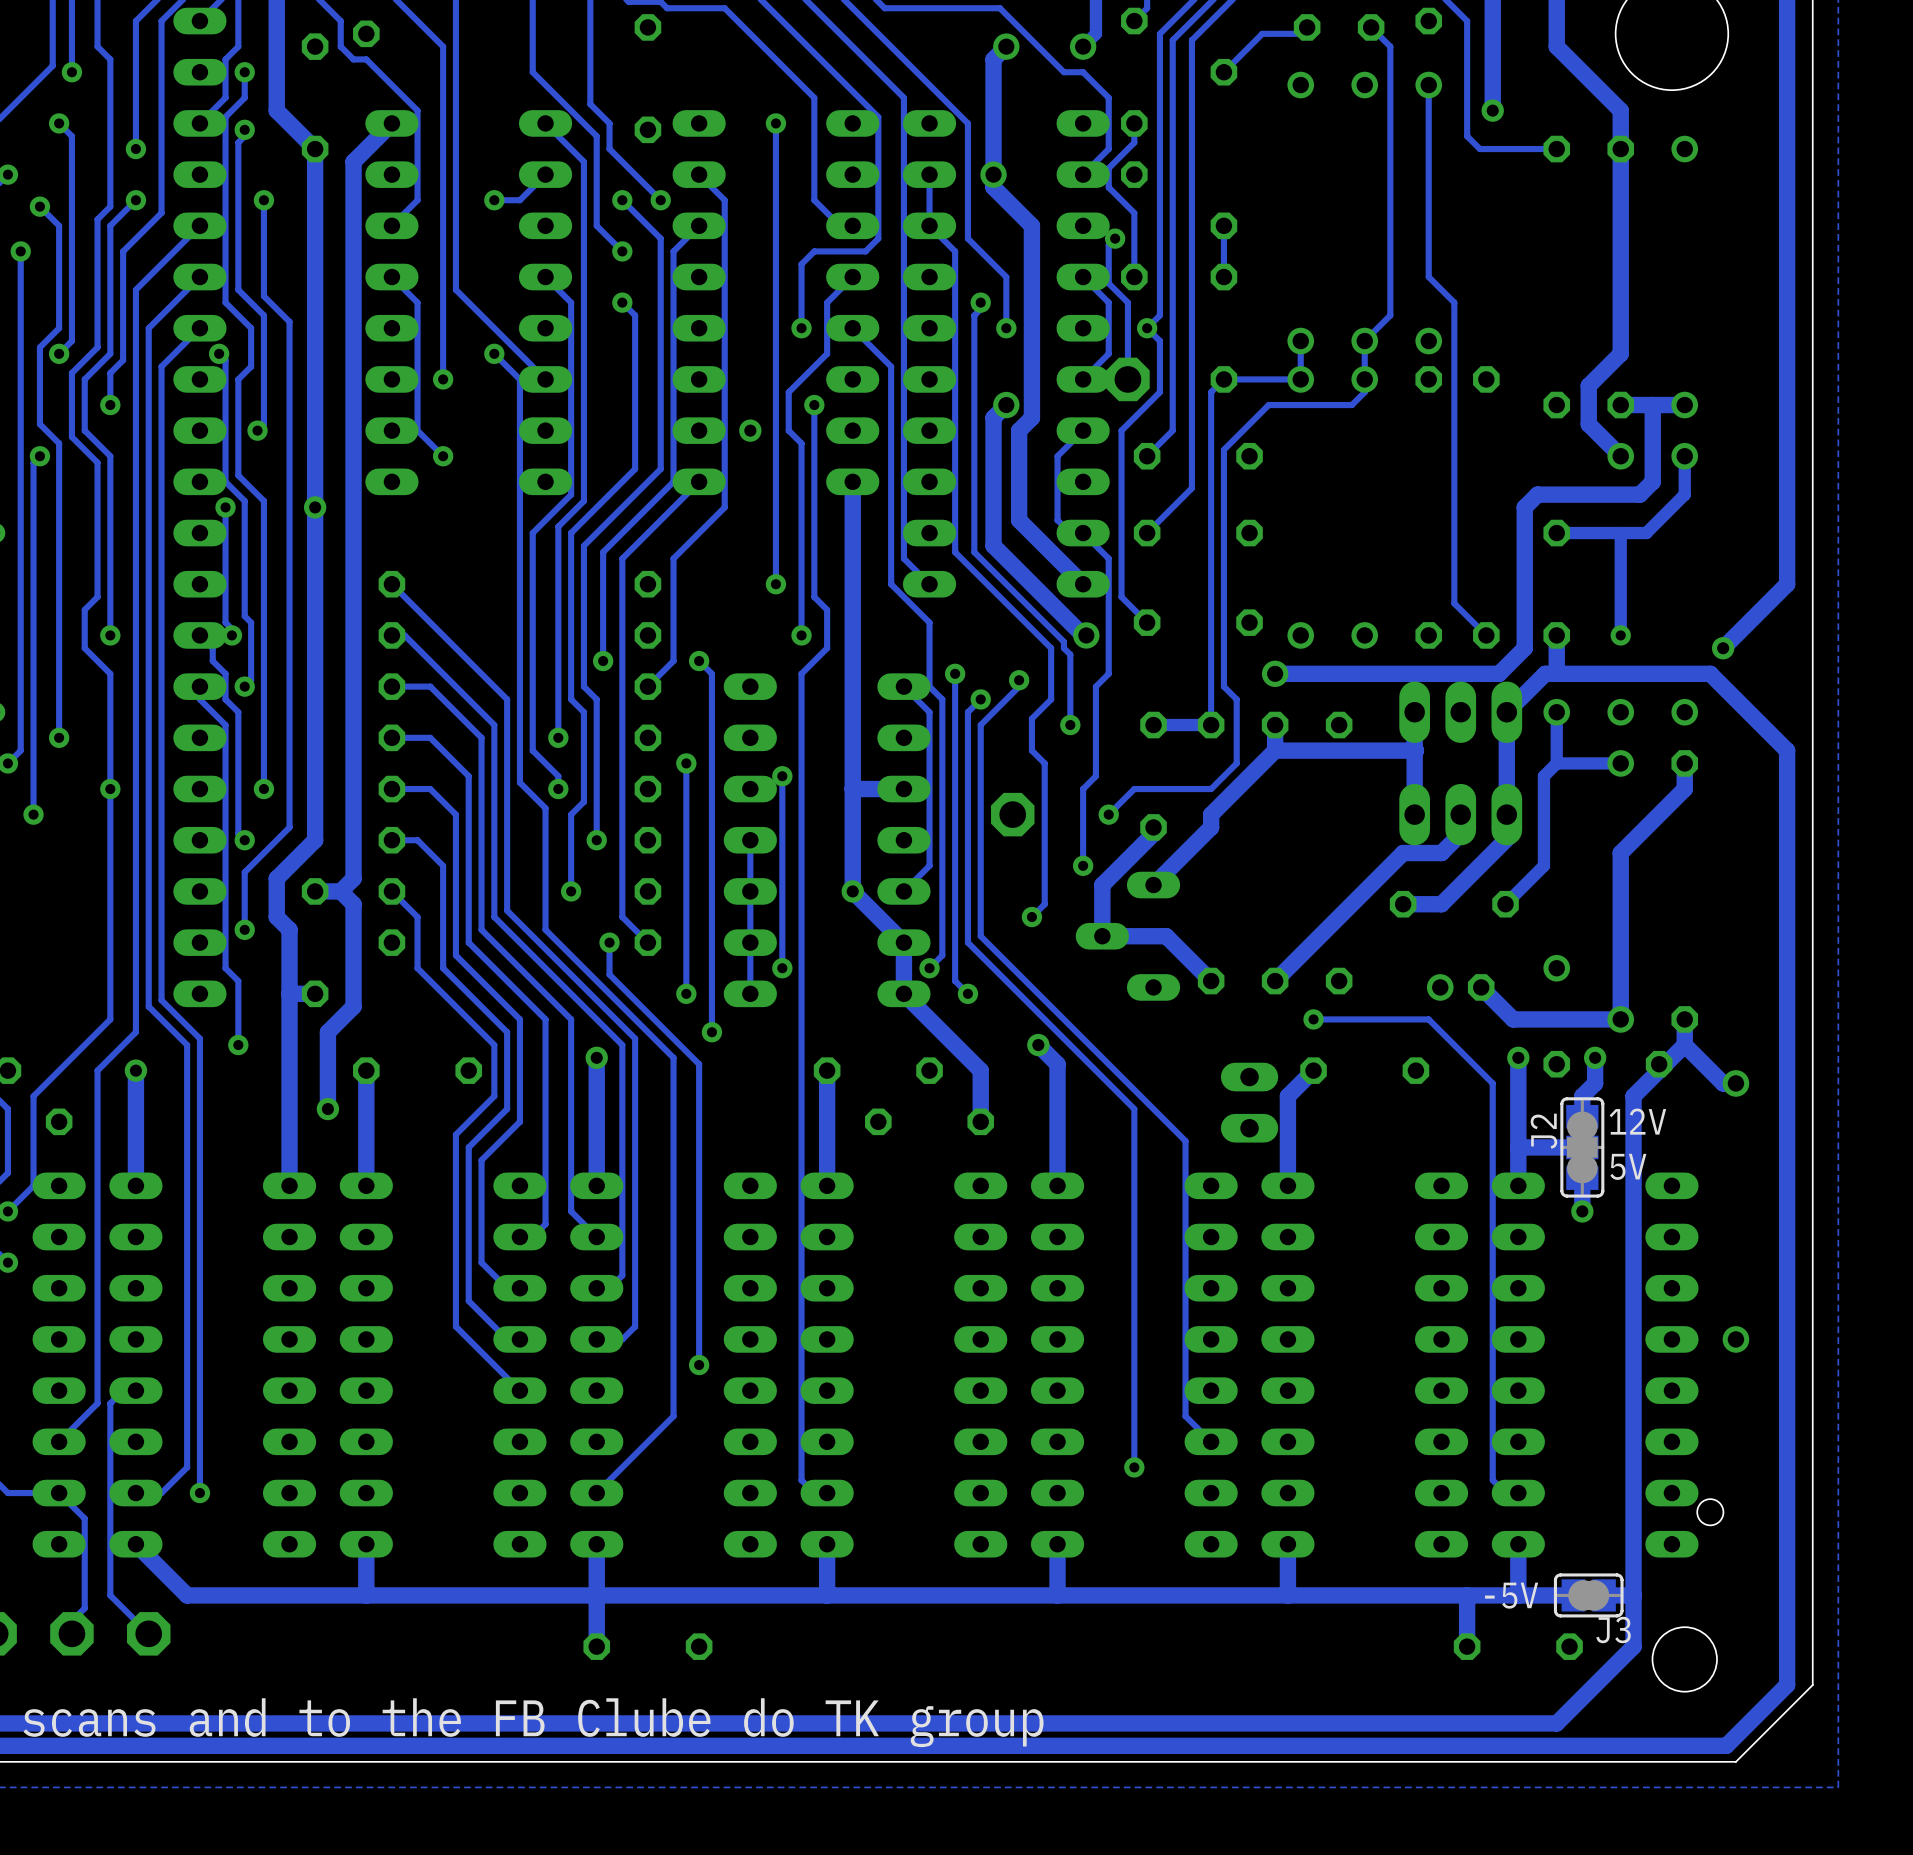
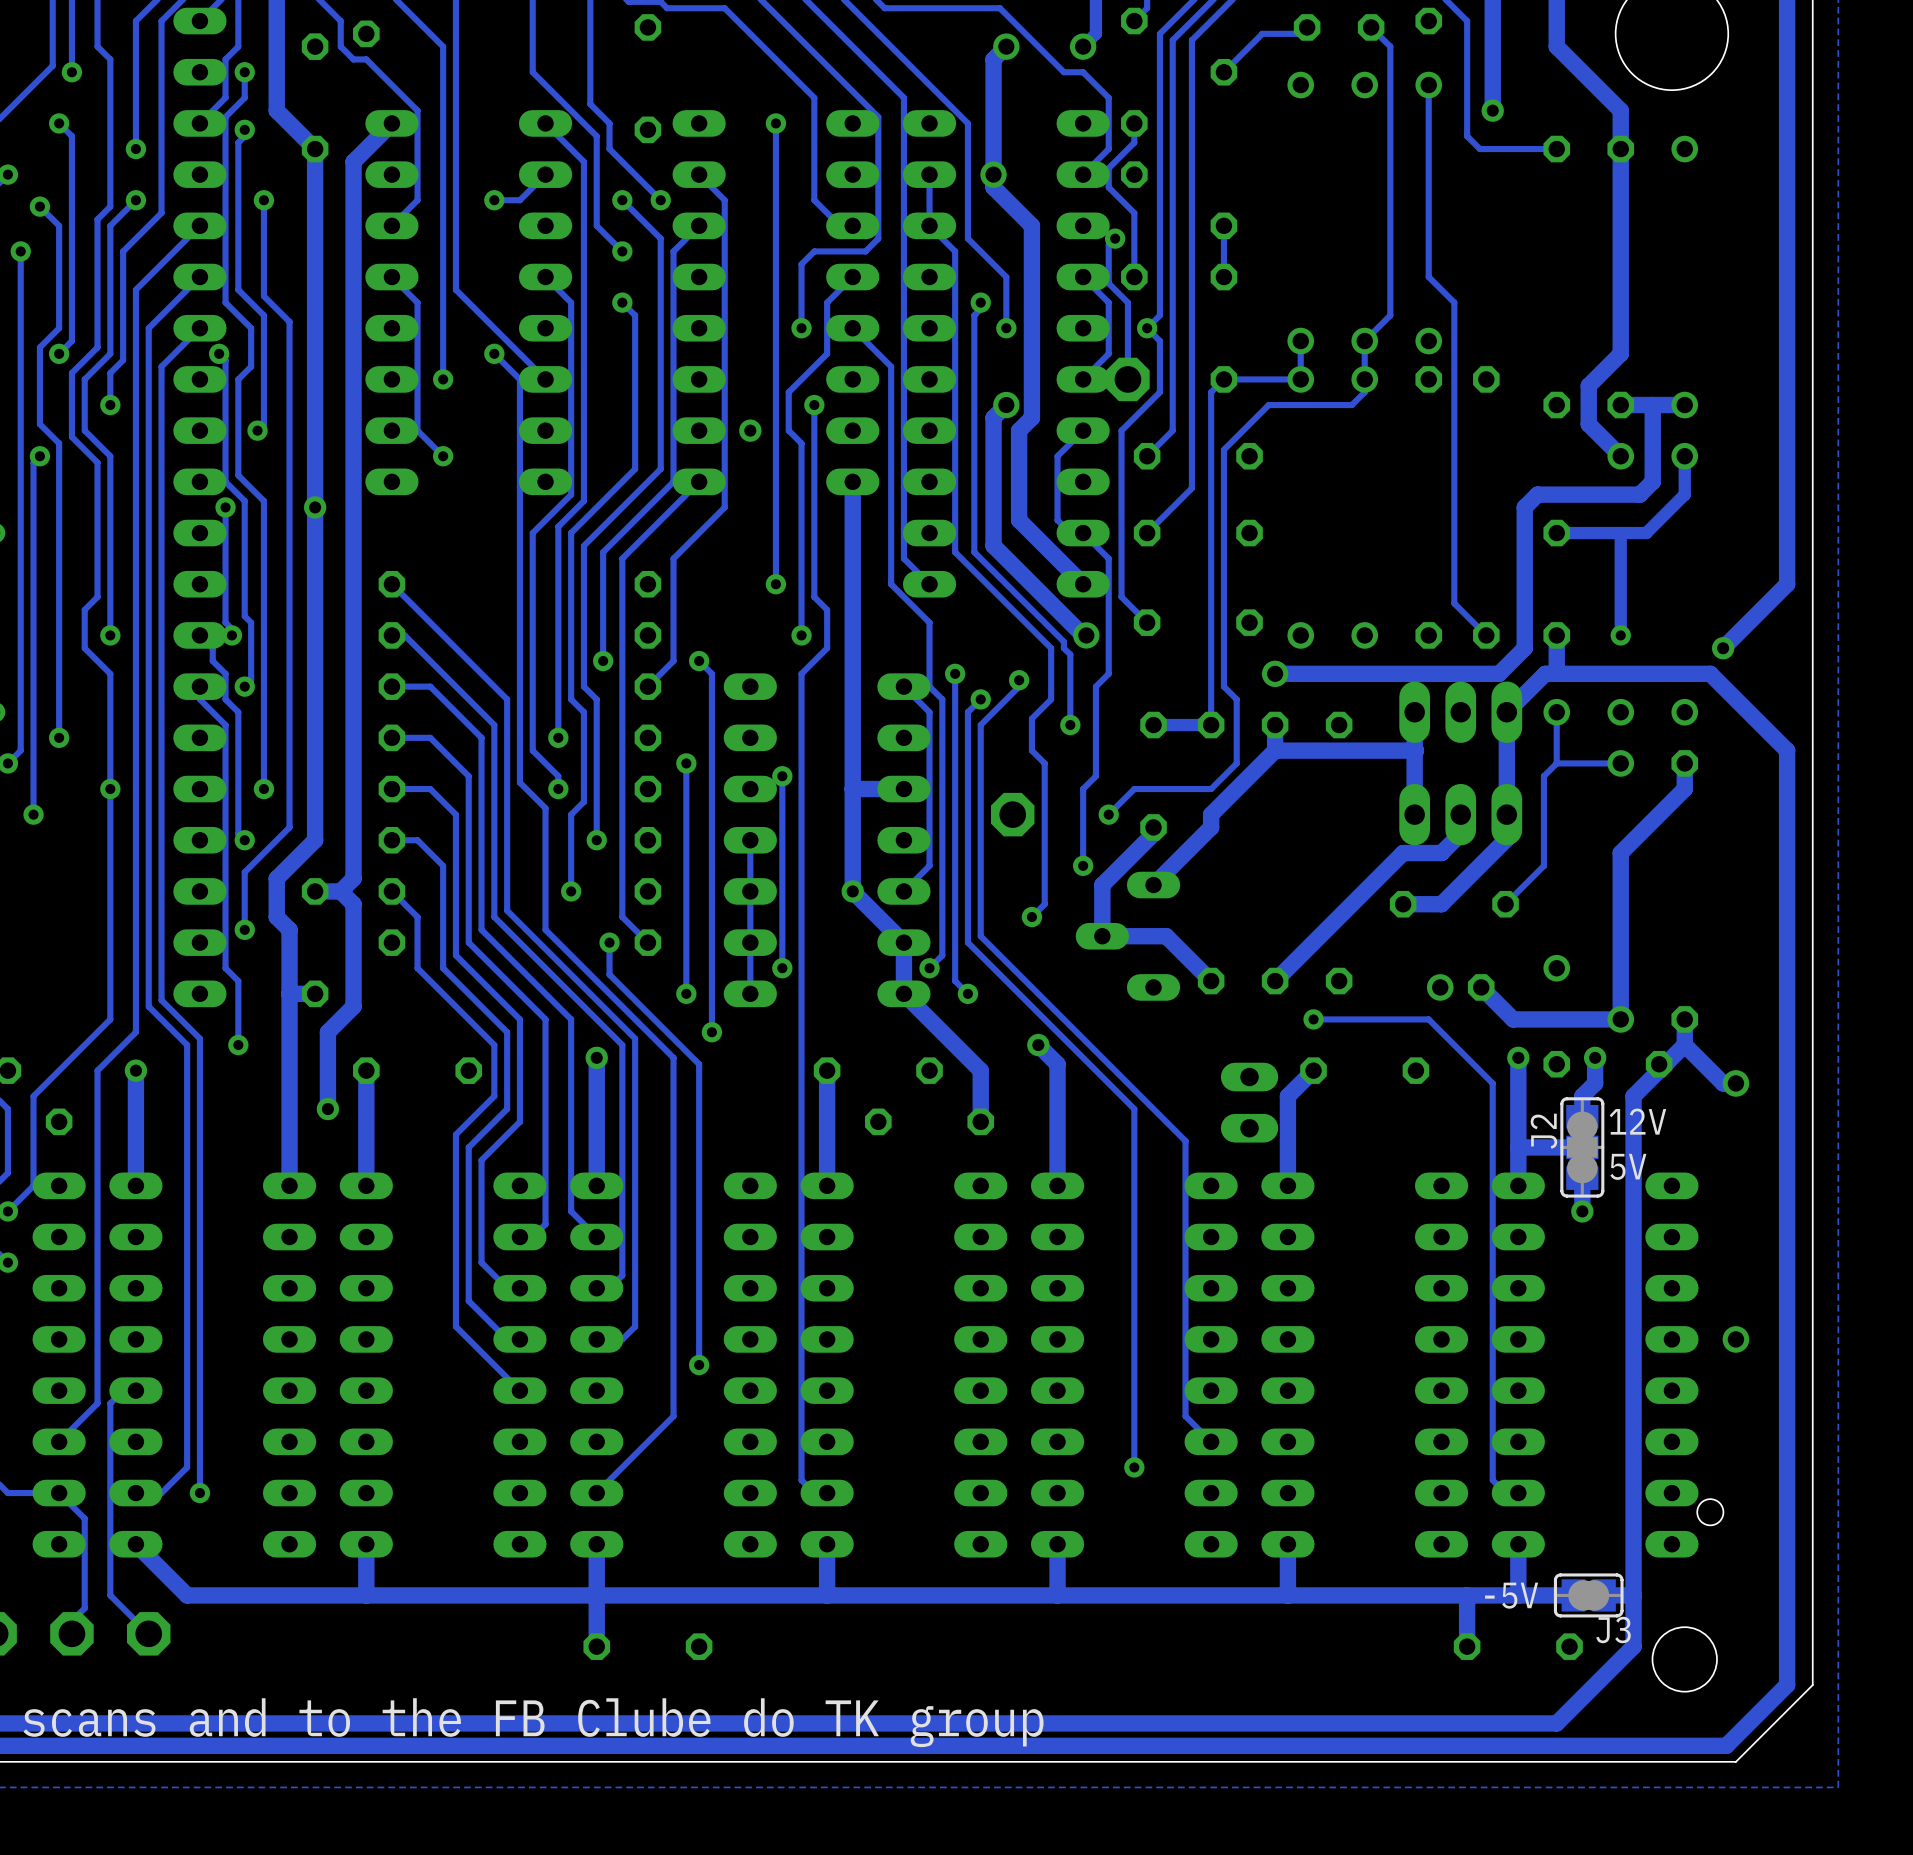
track width: thick (1556, 712) (1556, 763) -> thin (1556, 712) (1556, 763)
track width: thick (1556, 763) (1543, 776) (1543, 865) (1505, 904) -> thin (1556, 763) (1543, 776) (1543, 865) (1505, 904)
track width: thick (1620, 763) (1556, 763) -> thin (1620, 763) (1556, 763)

